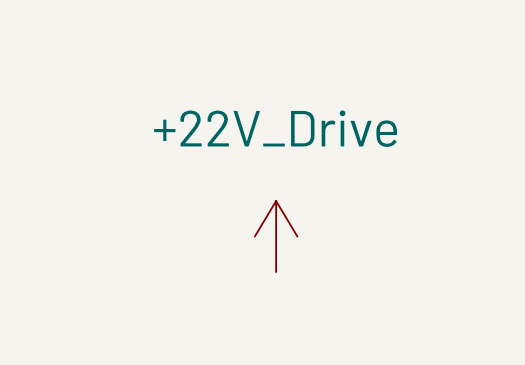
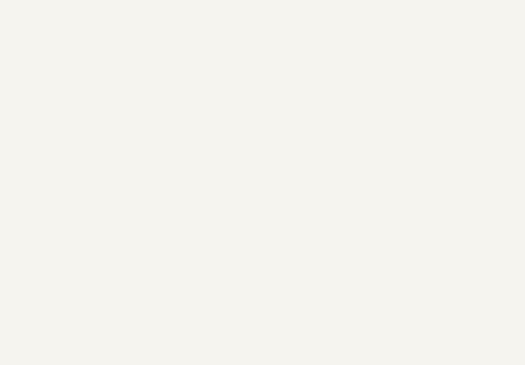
power symbol: +22V_Drive (276, 236) -> none

